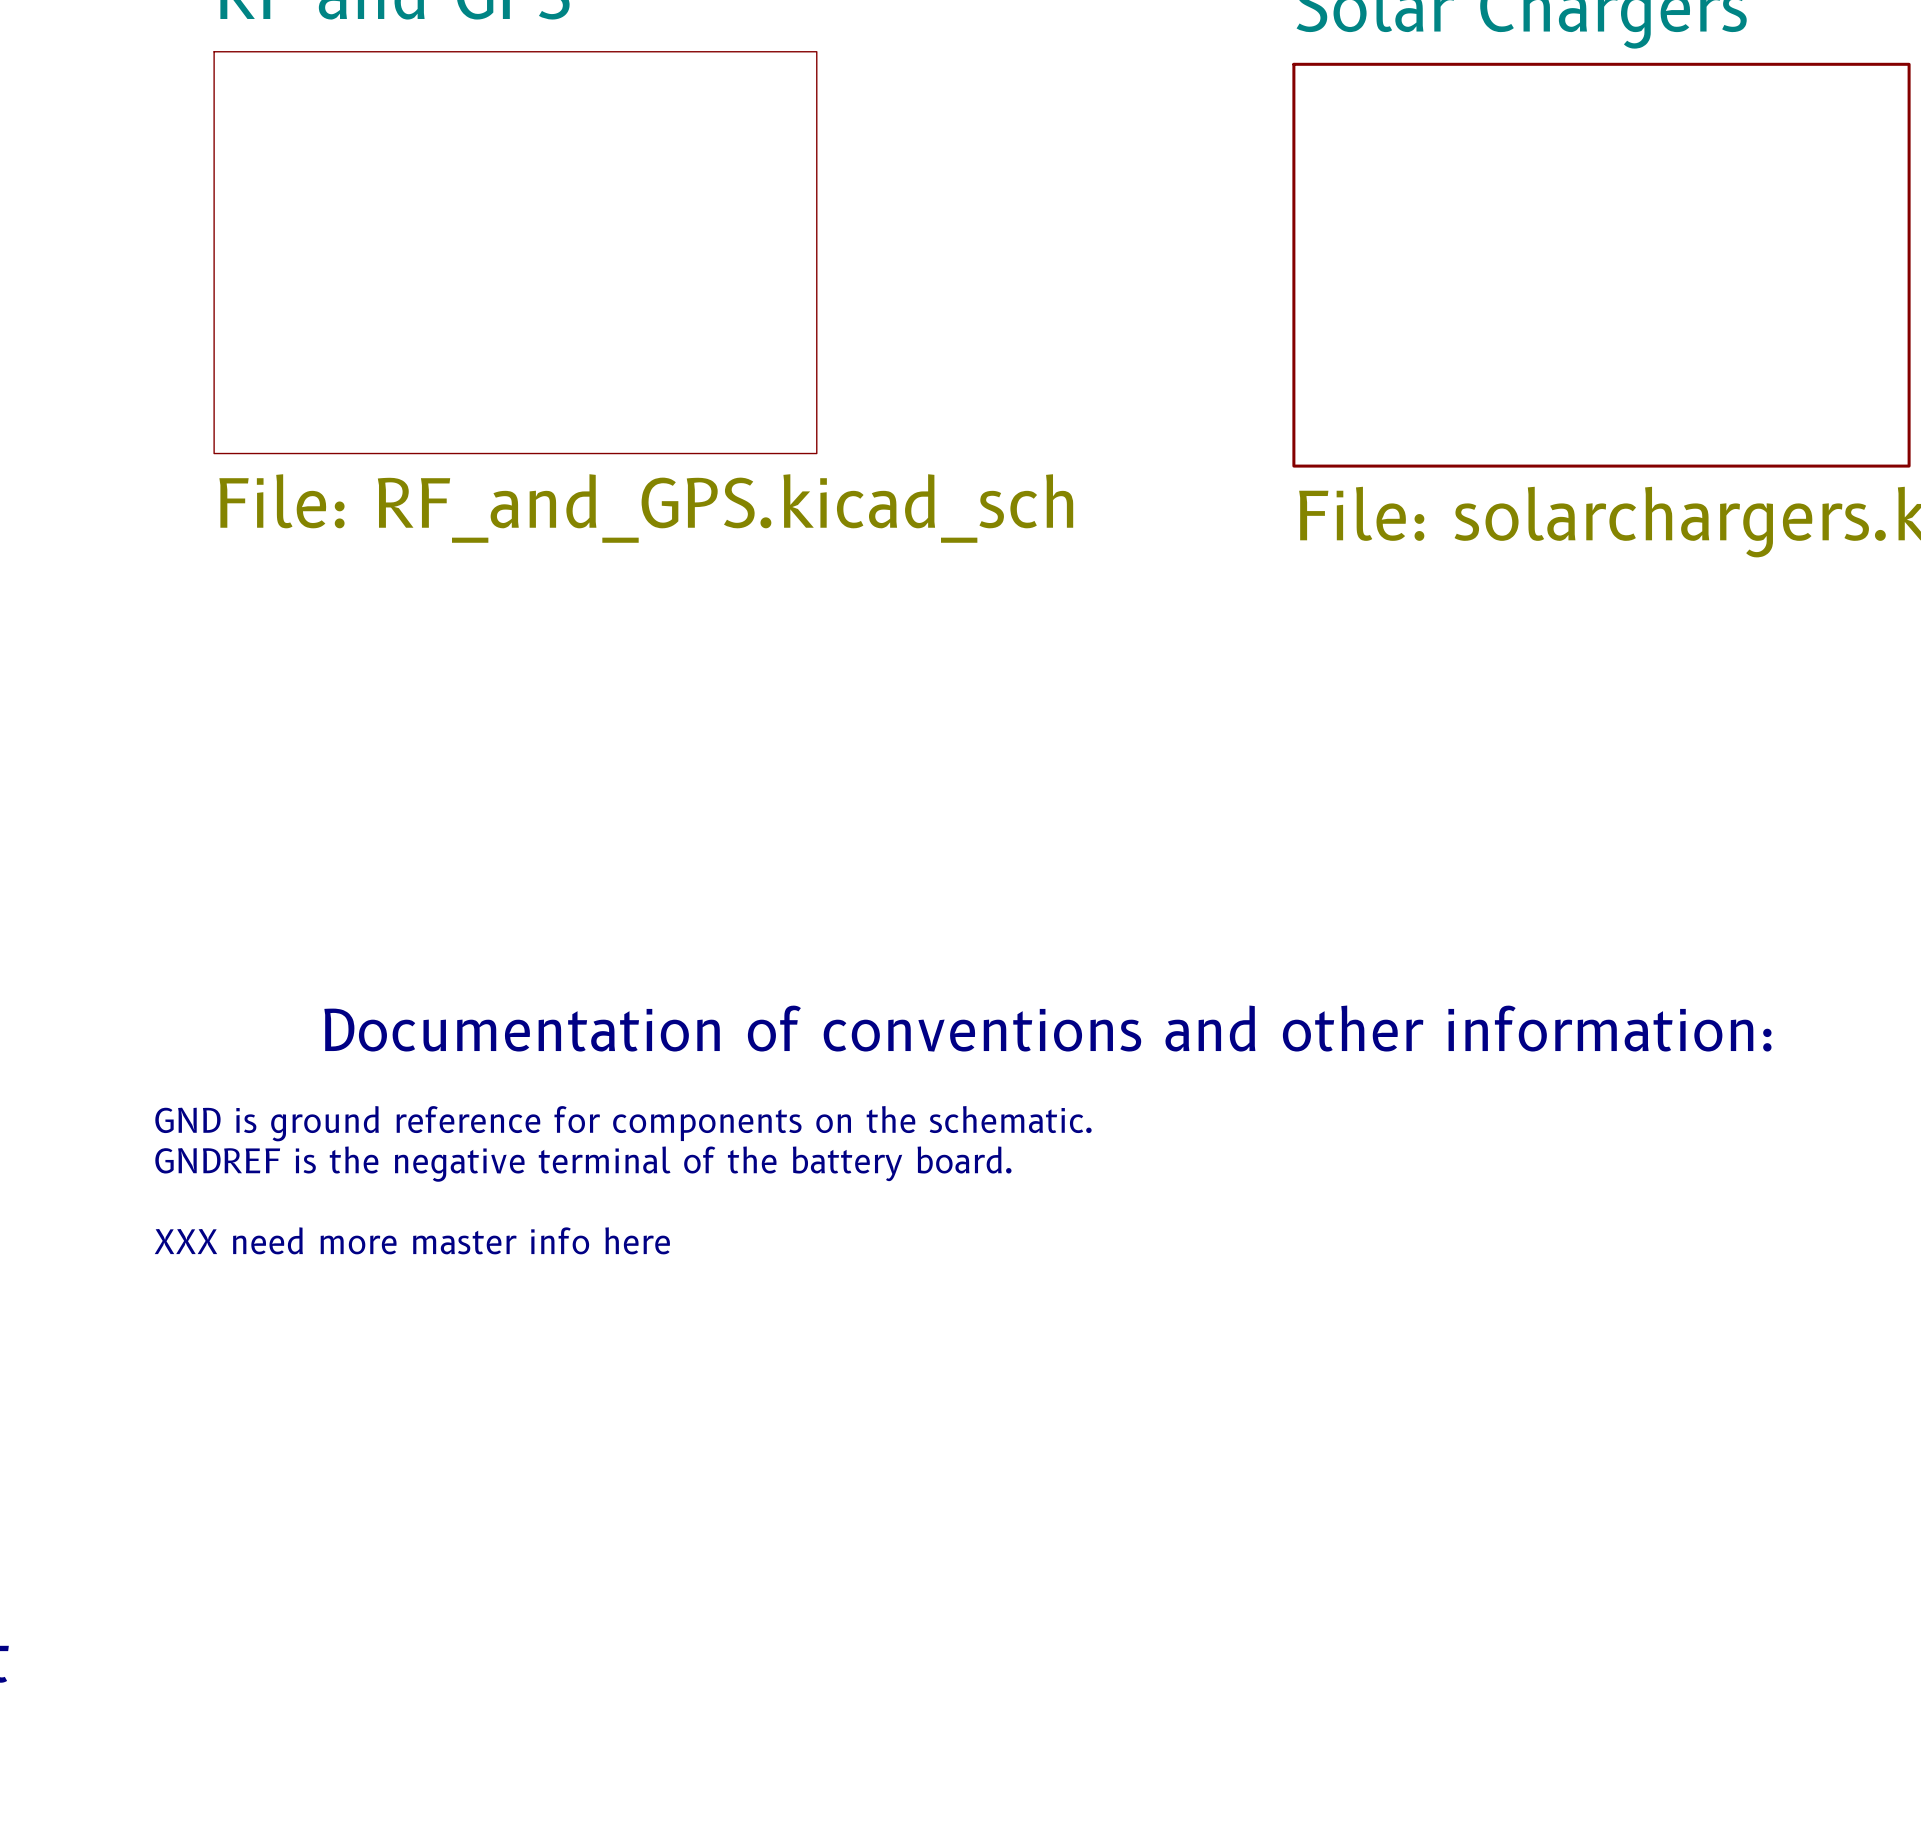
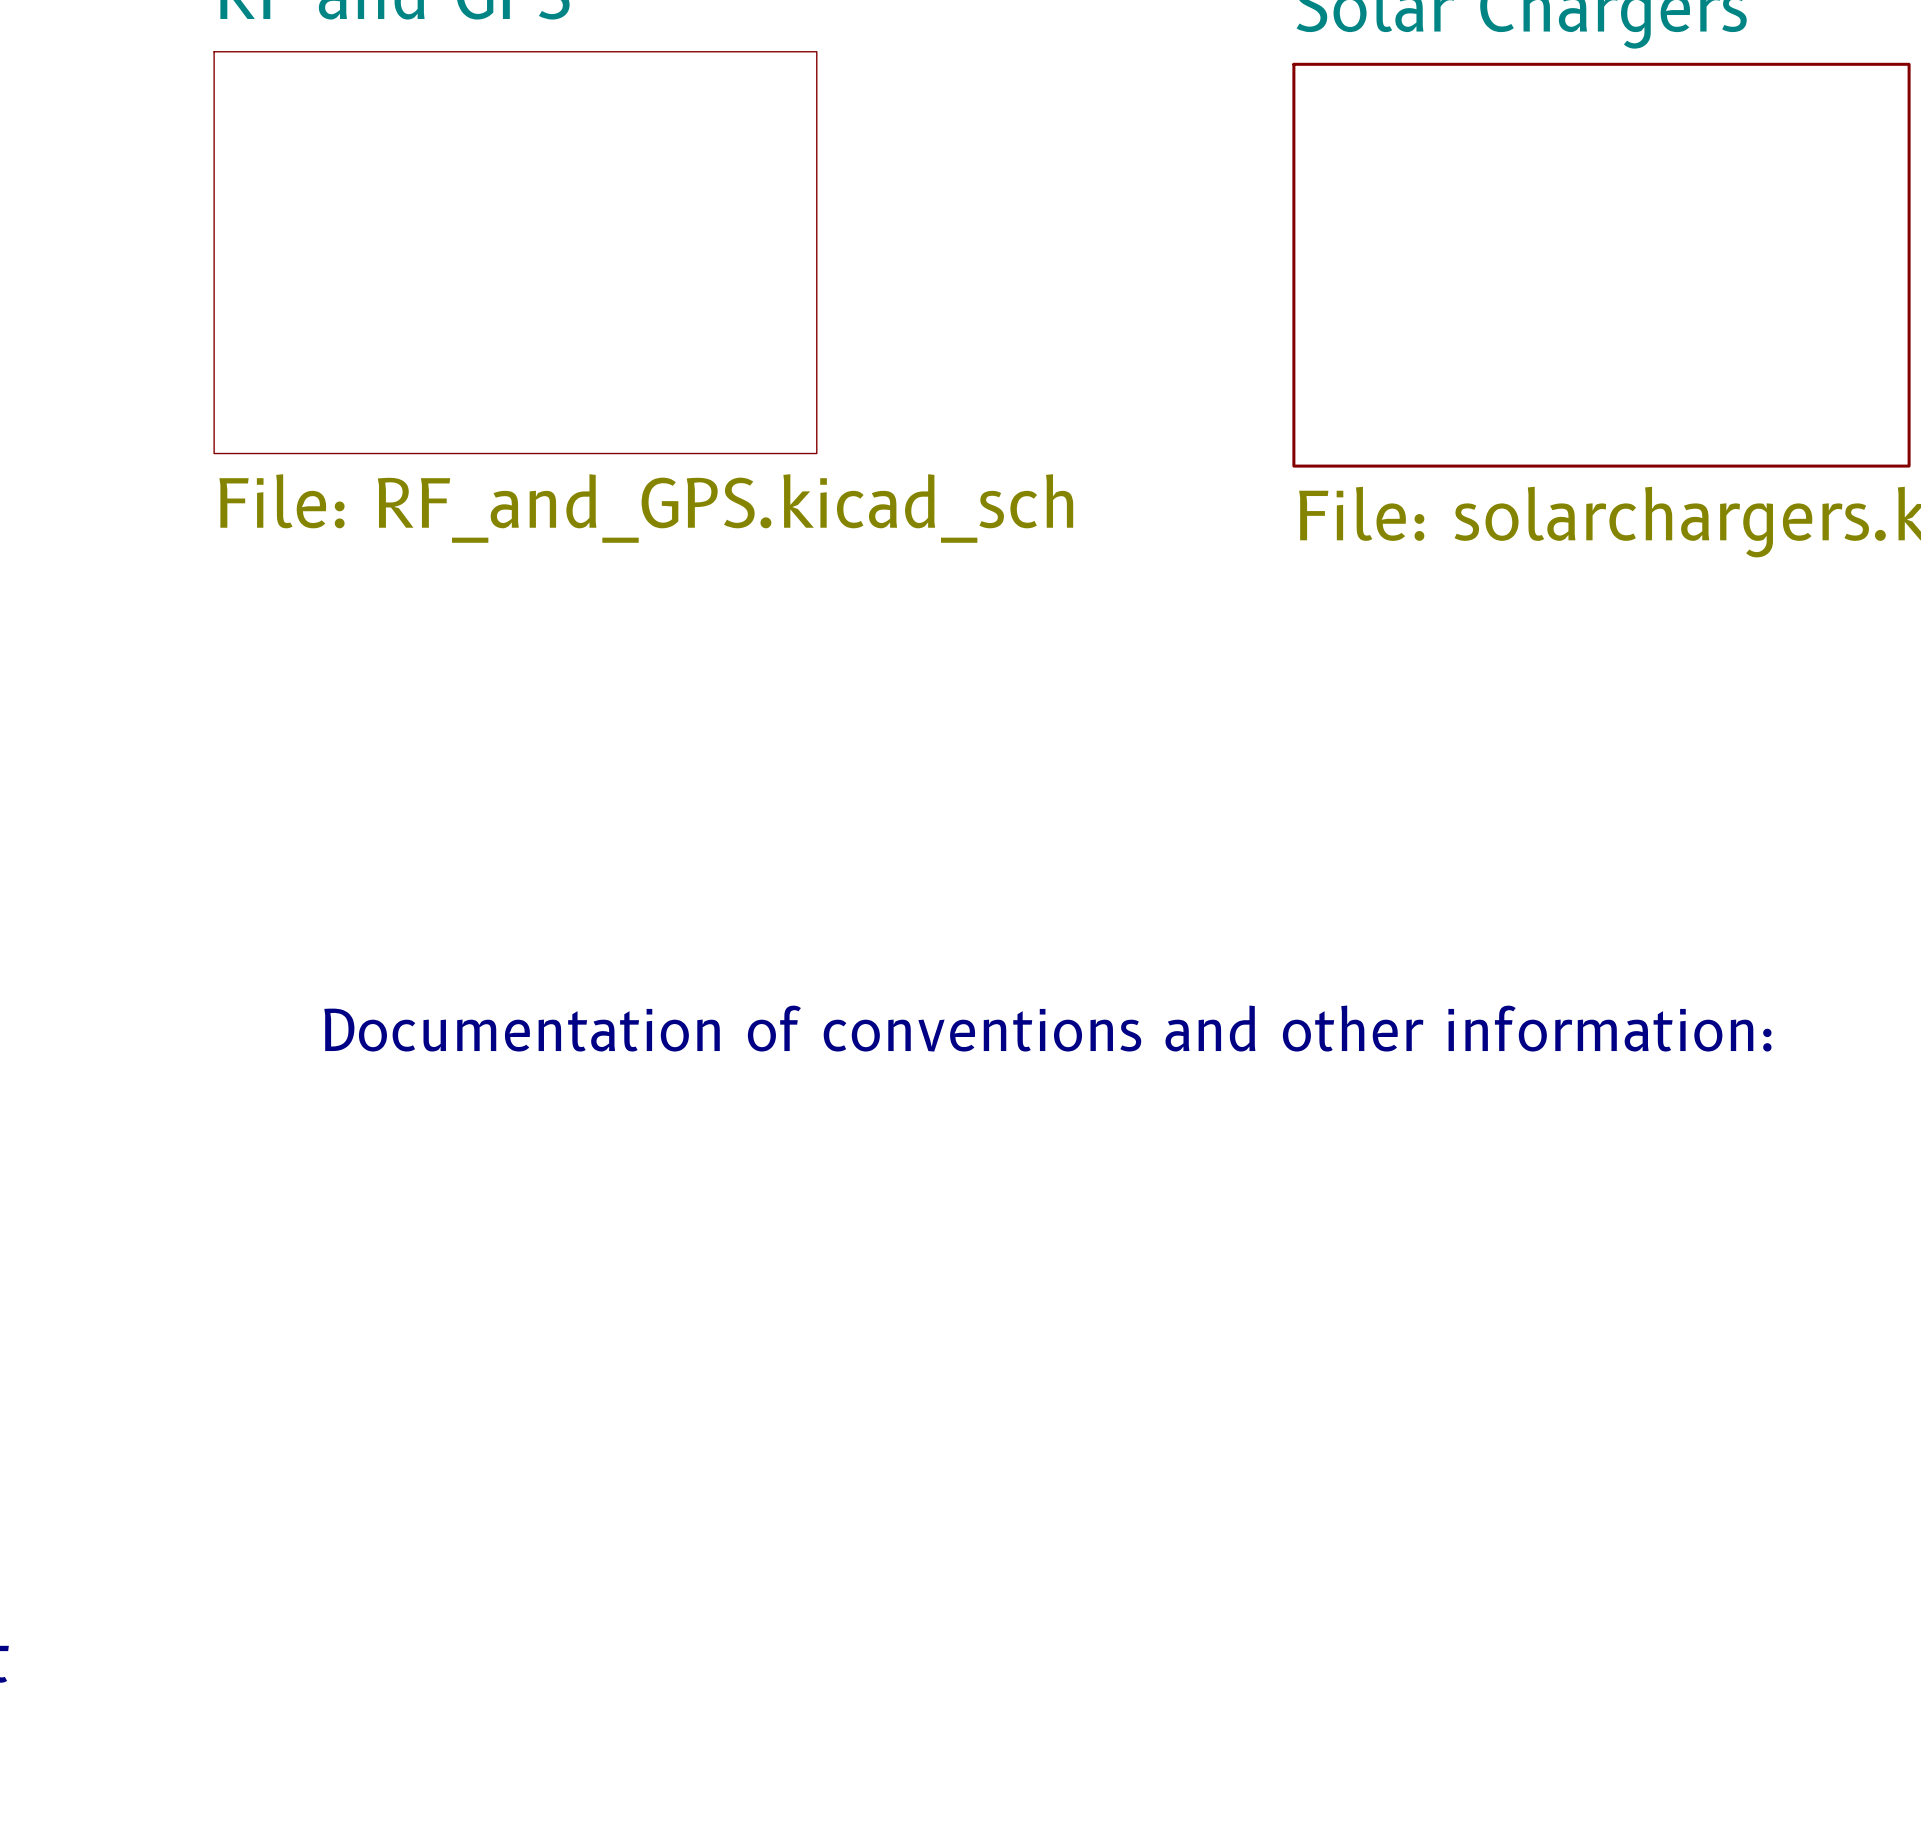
text: GND is ground reference for components on the schematic. (623, 1123) -> none
text: GNDREF is the negative terminal of the battery board. (583, 1164) -> none
text: XXX need more master info here (412, 1240) -> none

